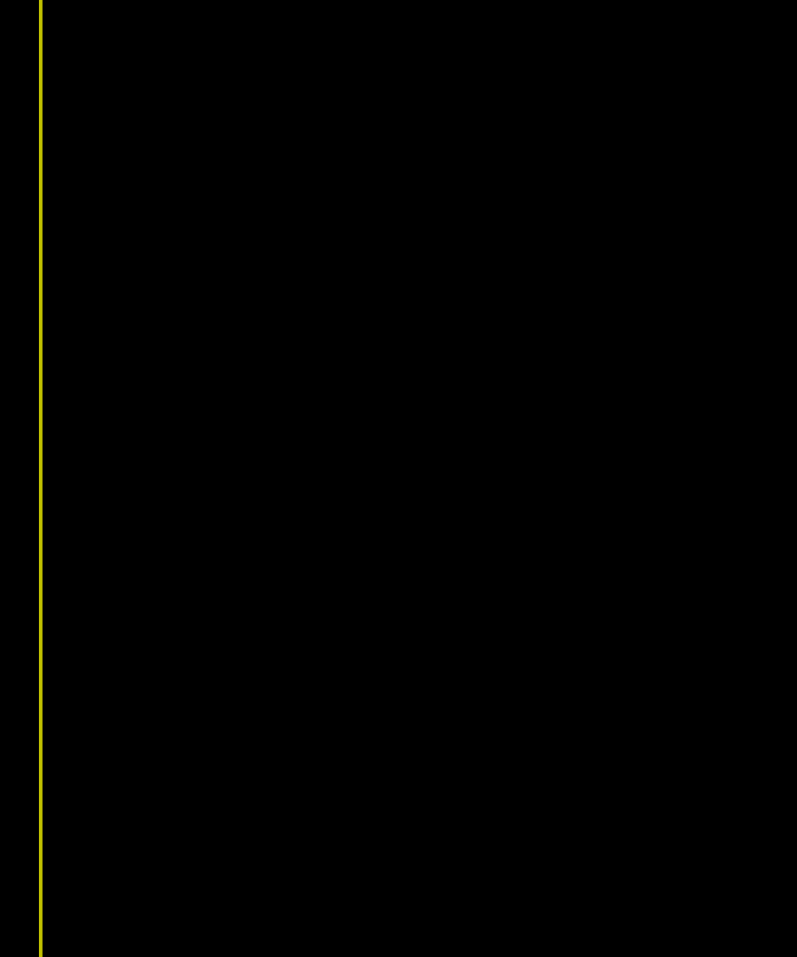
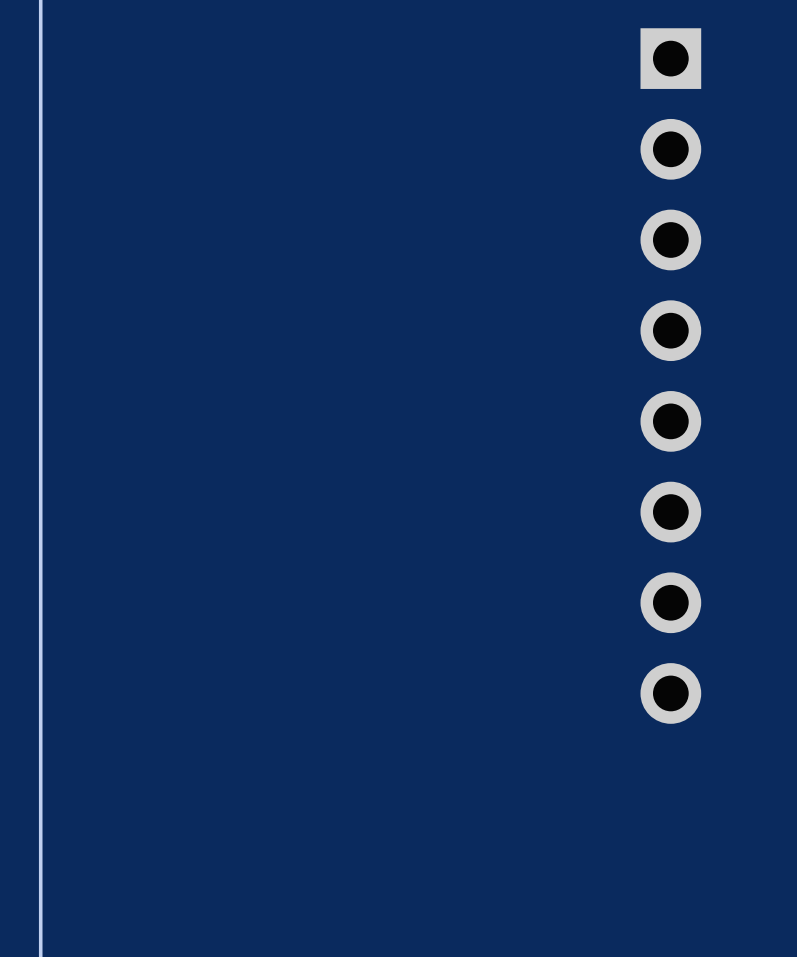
part: none -> (670, 376)

